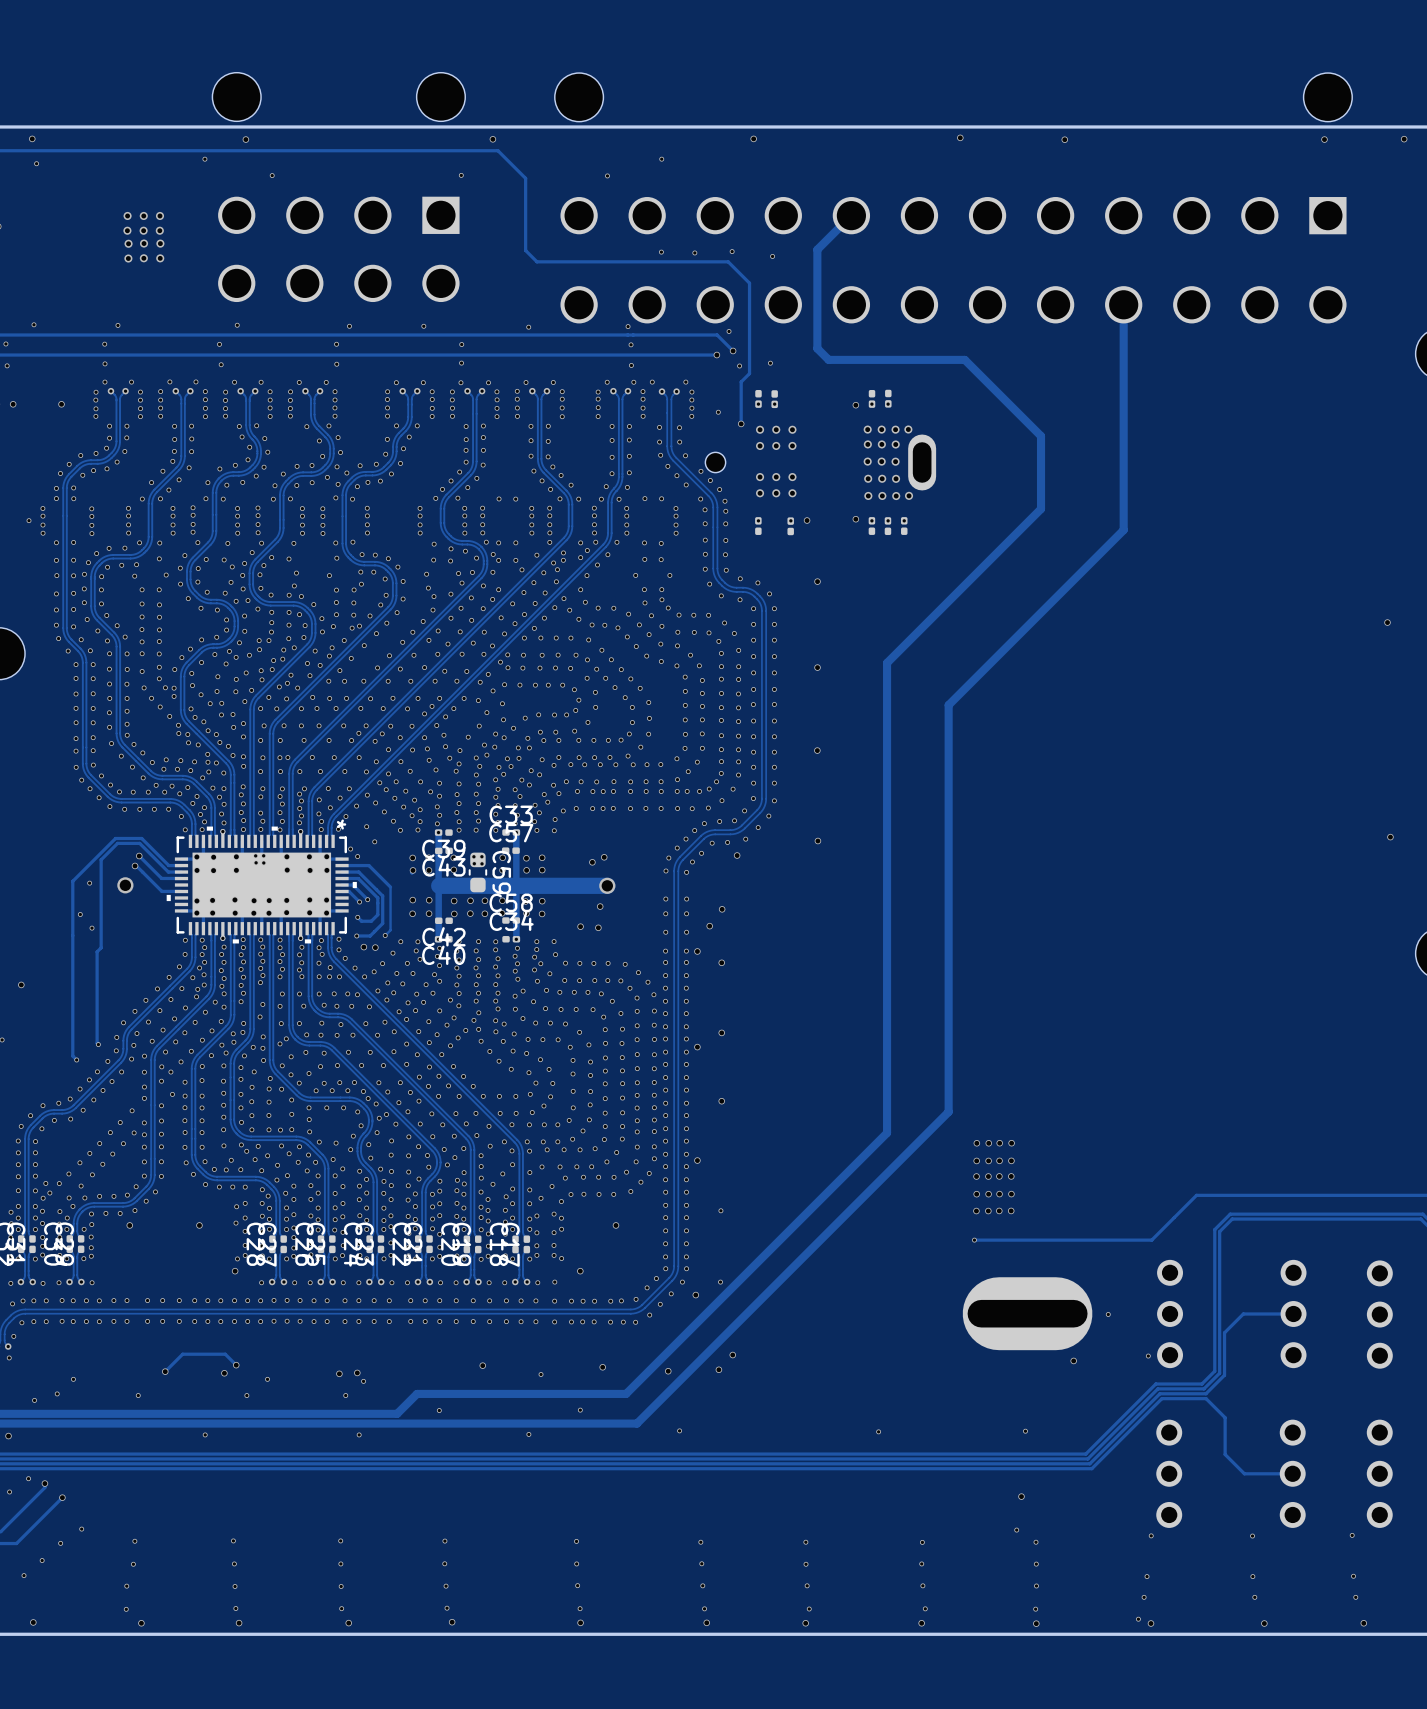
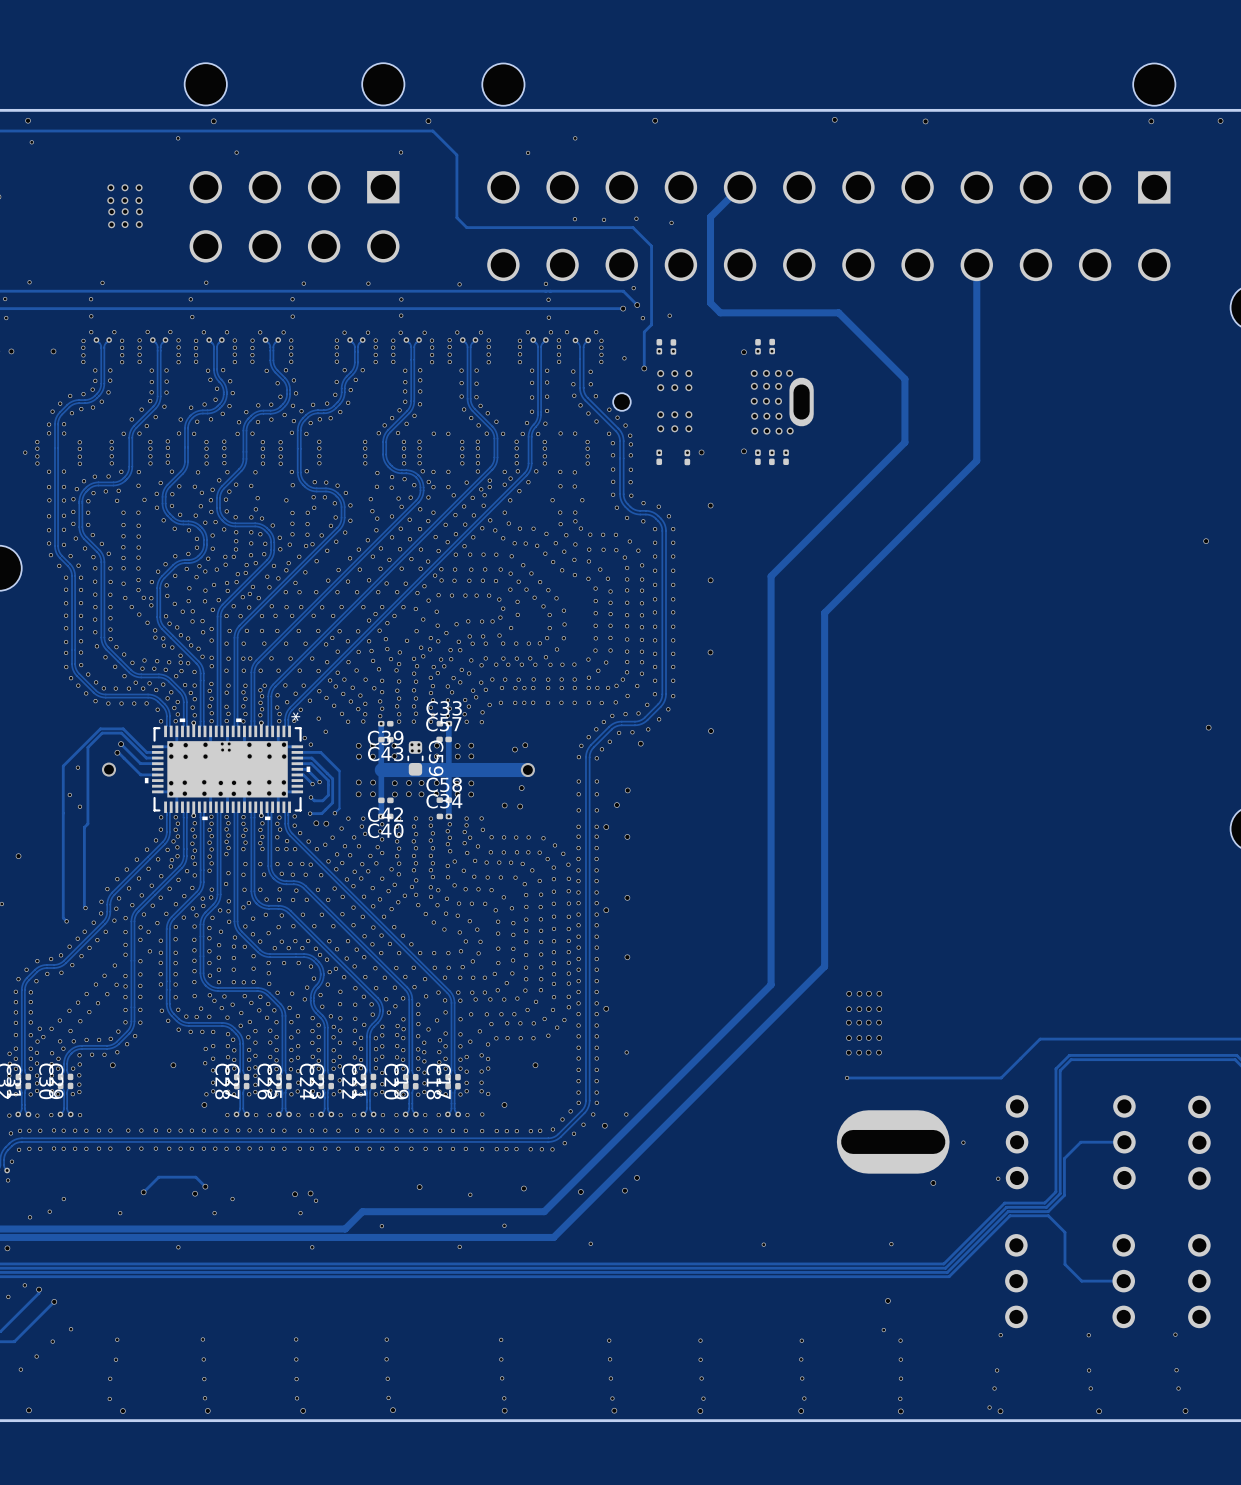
via: (407, 708) -> none
via: (358, 733) -> none

